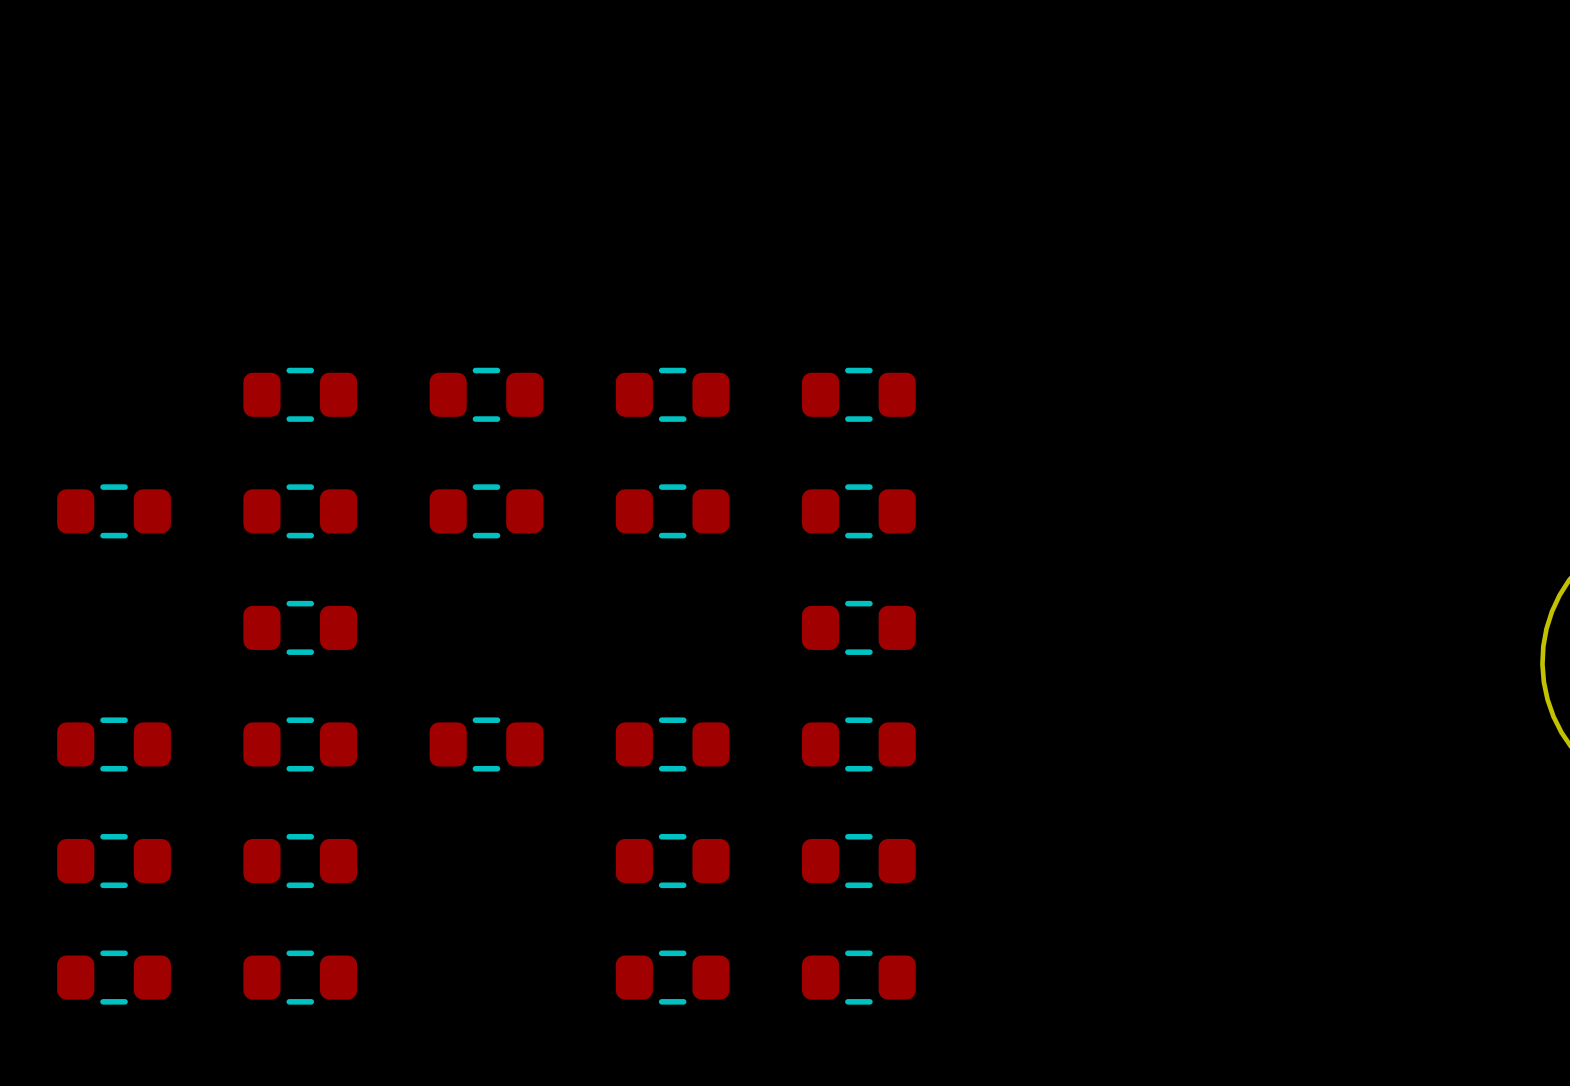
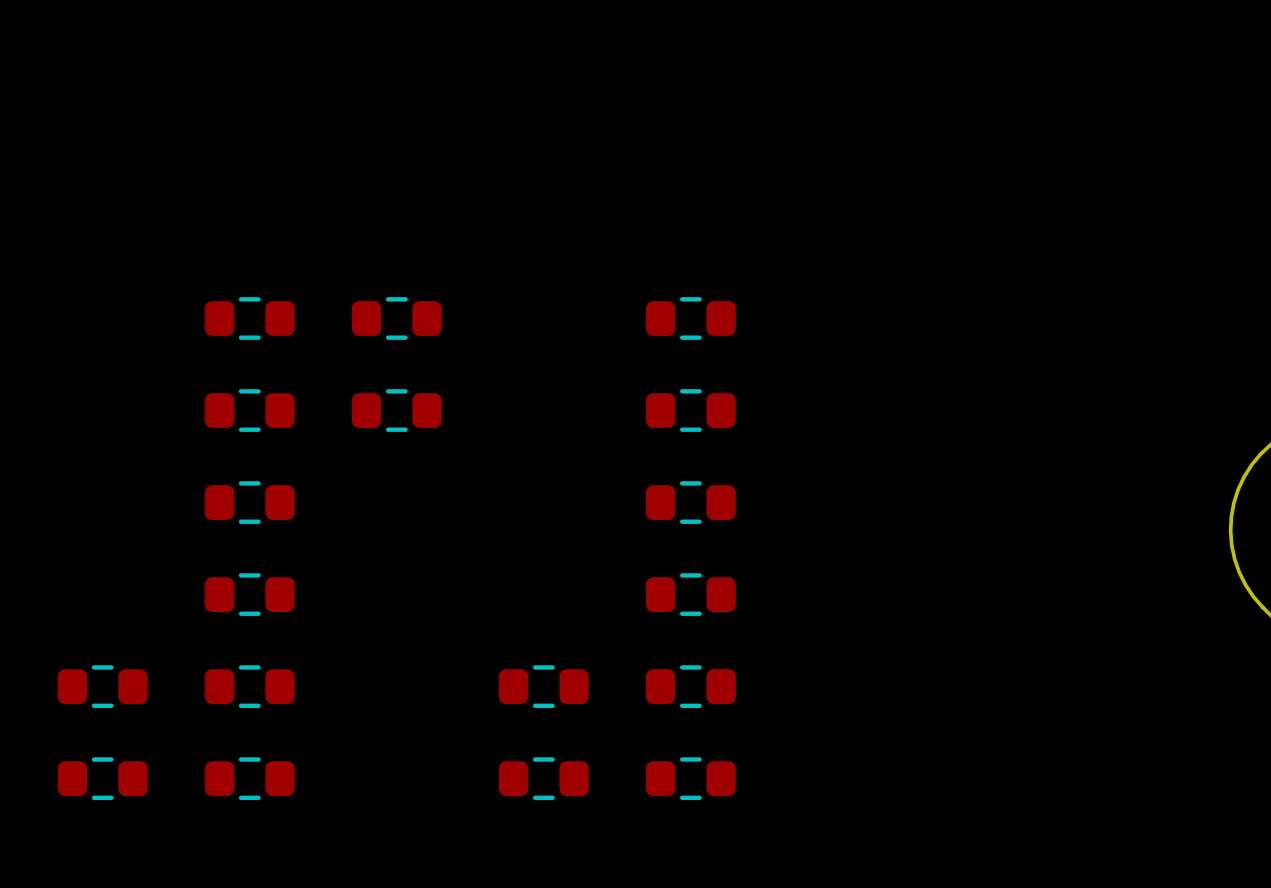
part: (672, 394) -> none
part: (114, 511) -> none
part: (672, 511) -> none
part: (114, 744) -> none
part: (486, 744) -> none
part: (672, 744) -> none

